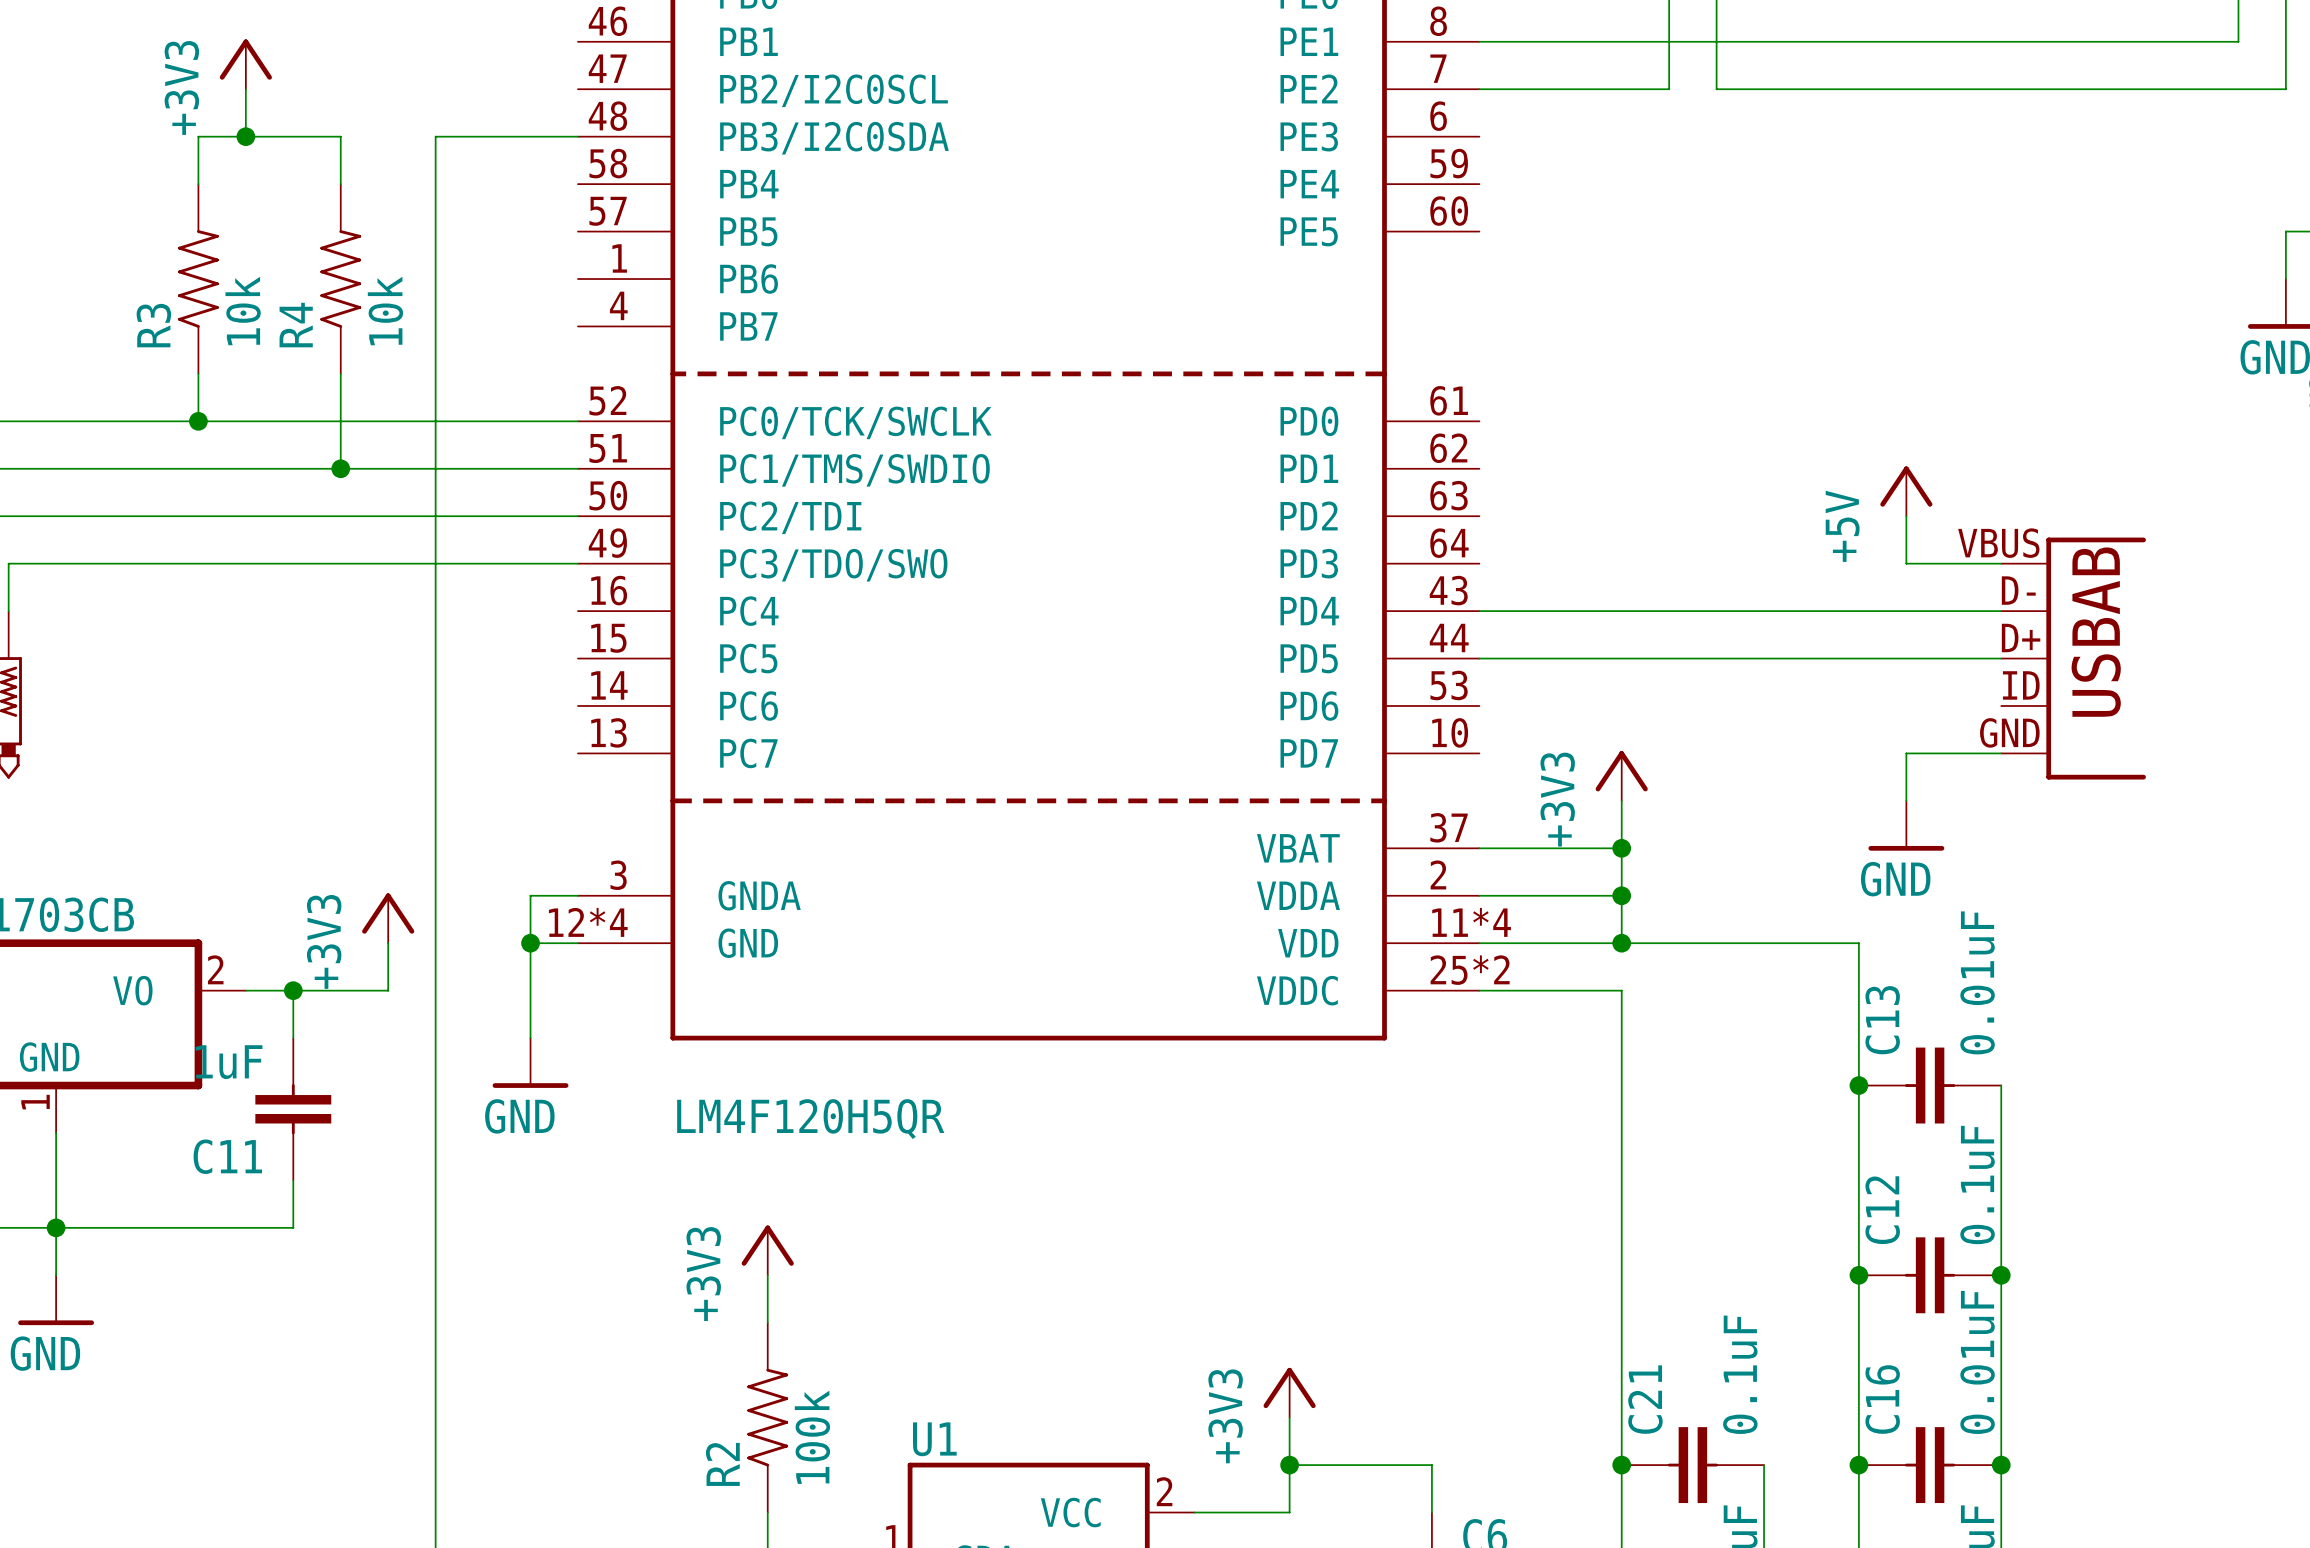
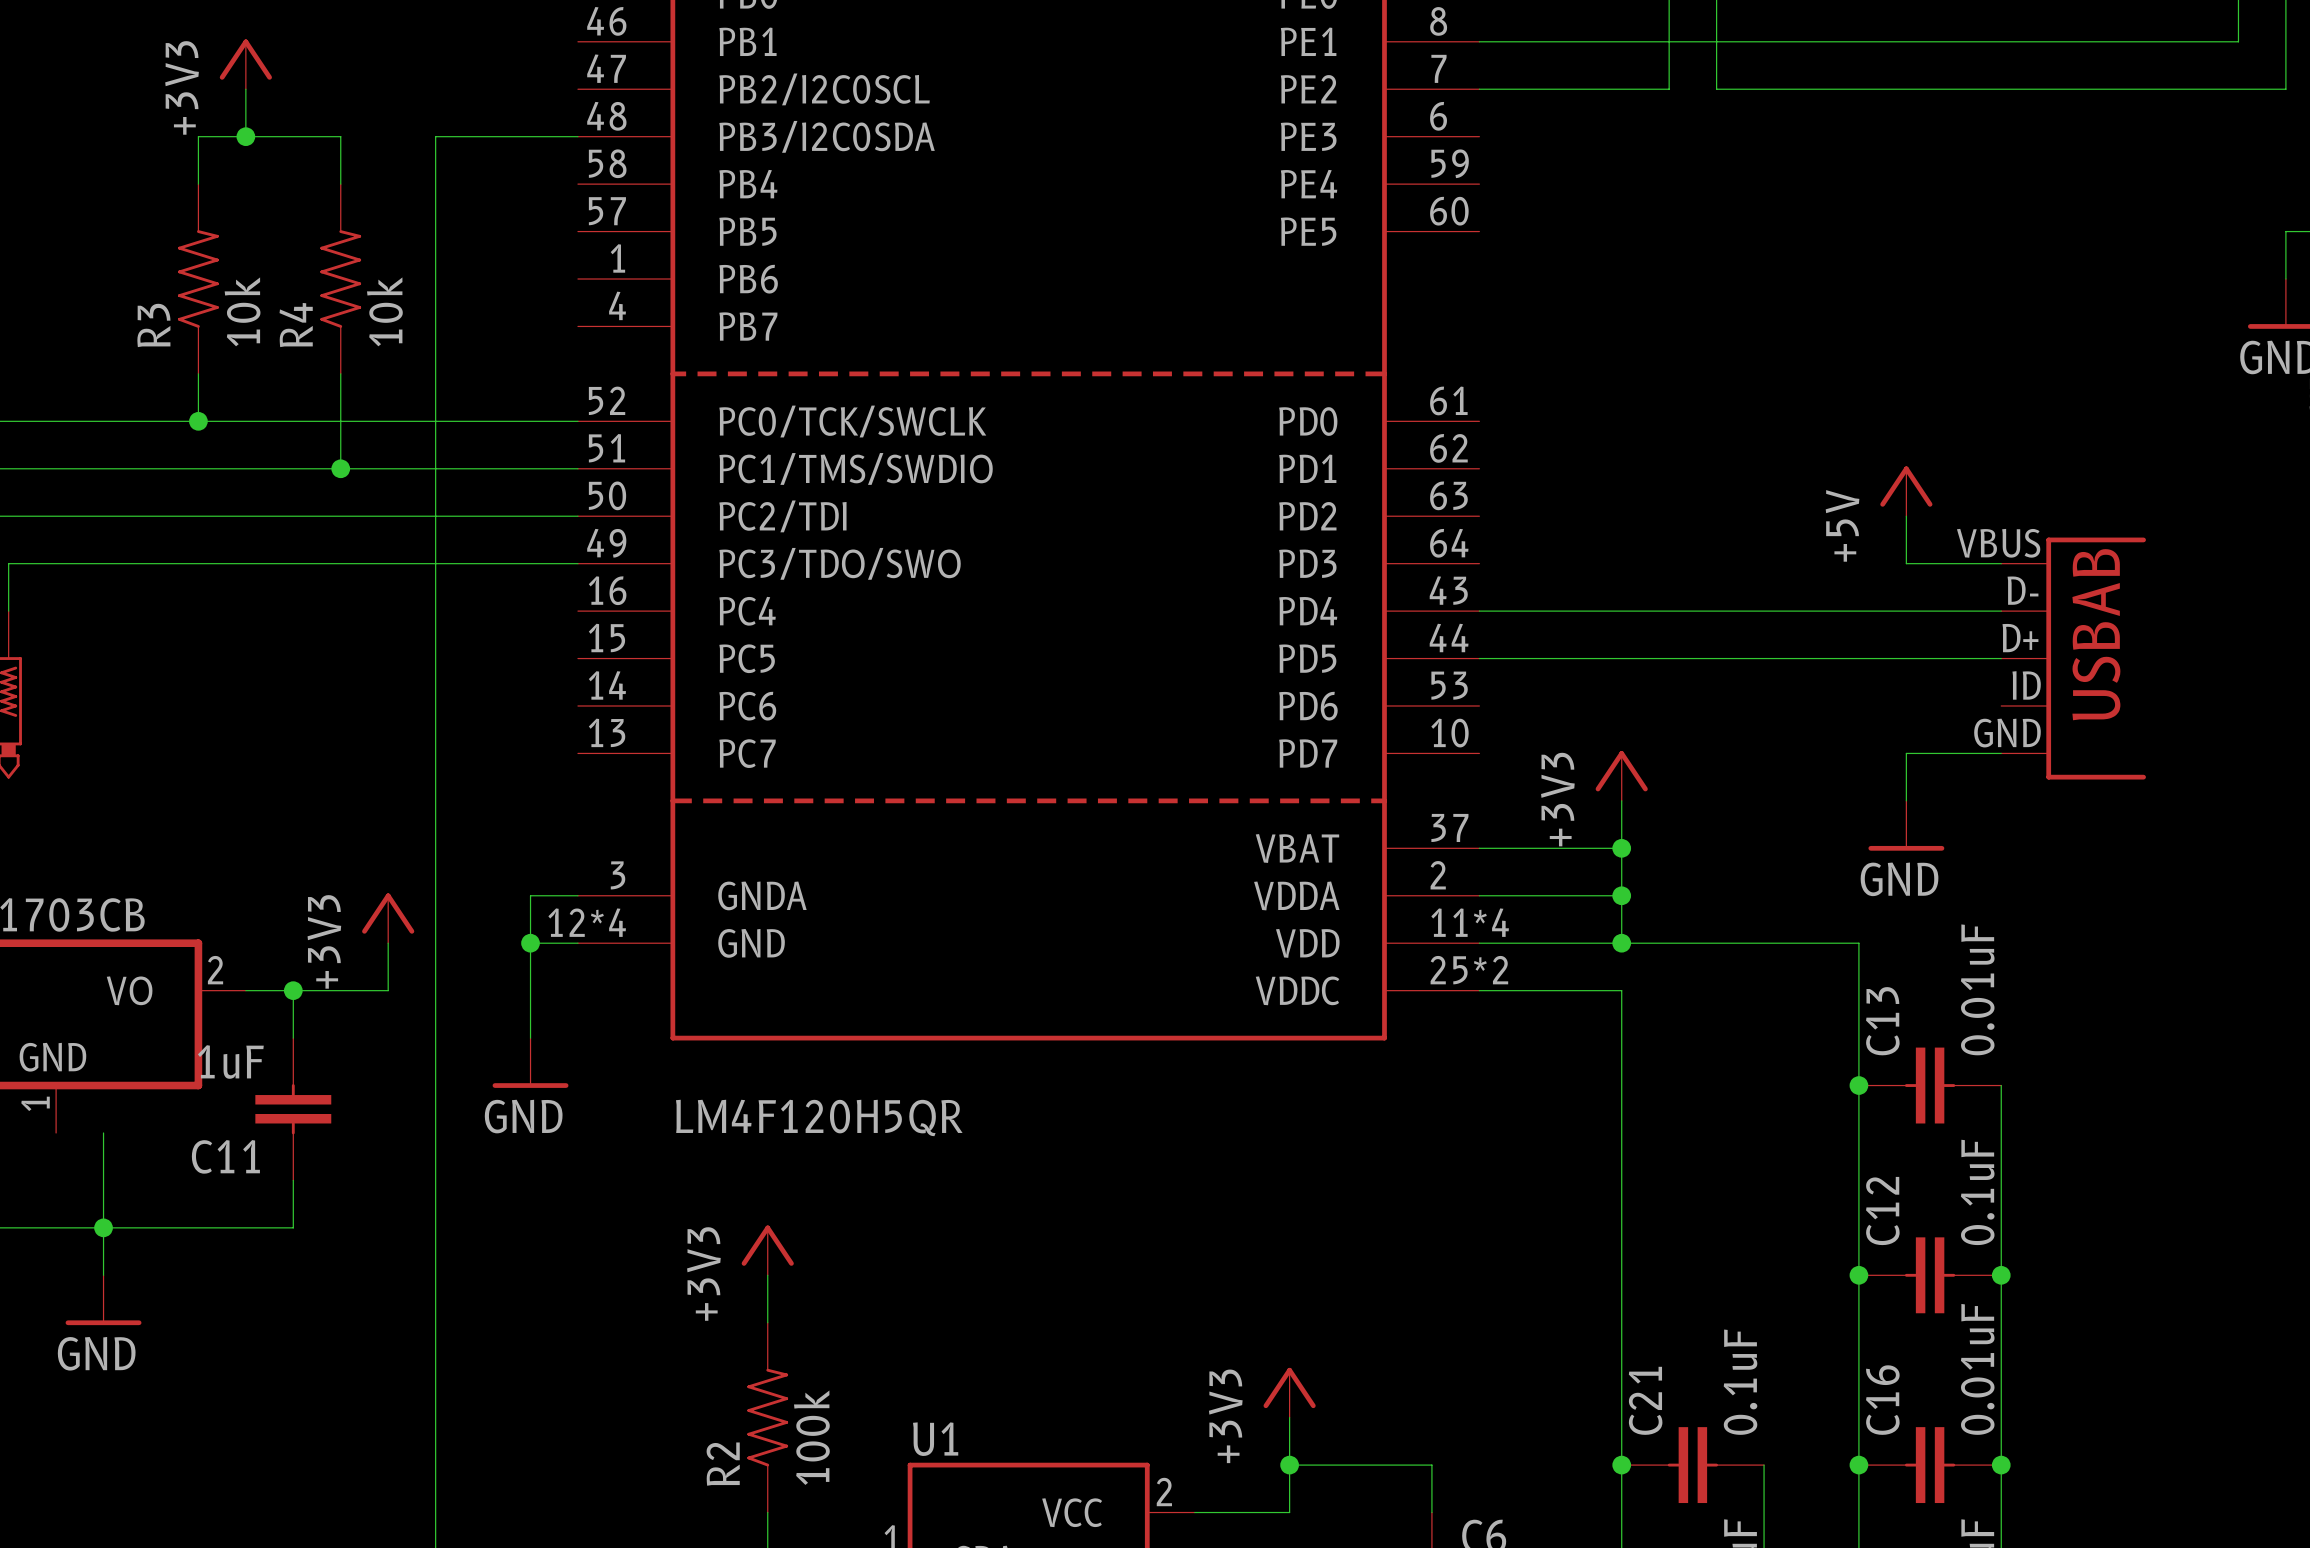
wire: (56, 1132) (56, 1275) -> (103, 1132) (103, 1275)
junction position: (56, 1227) -> (103, 1227)
power symbol position: GND (56, 1300) -> GND (103, 1300)

